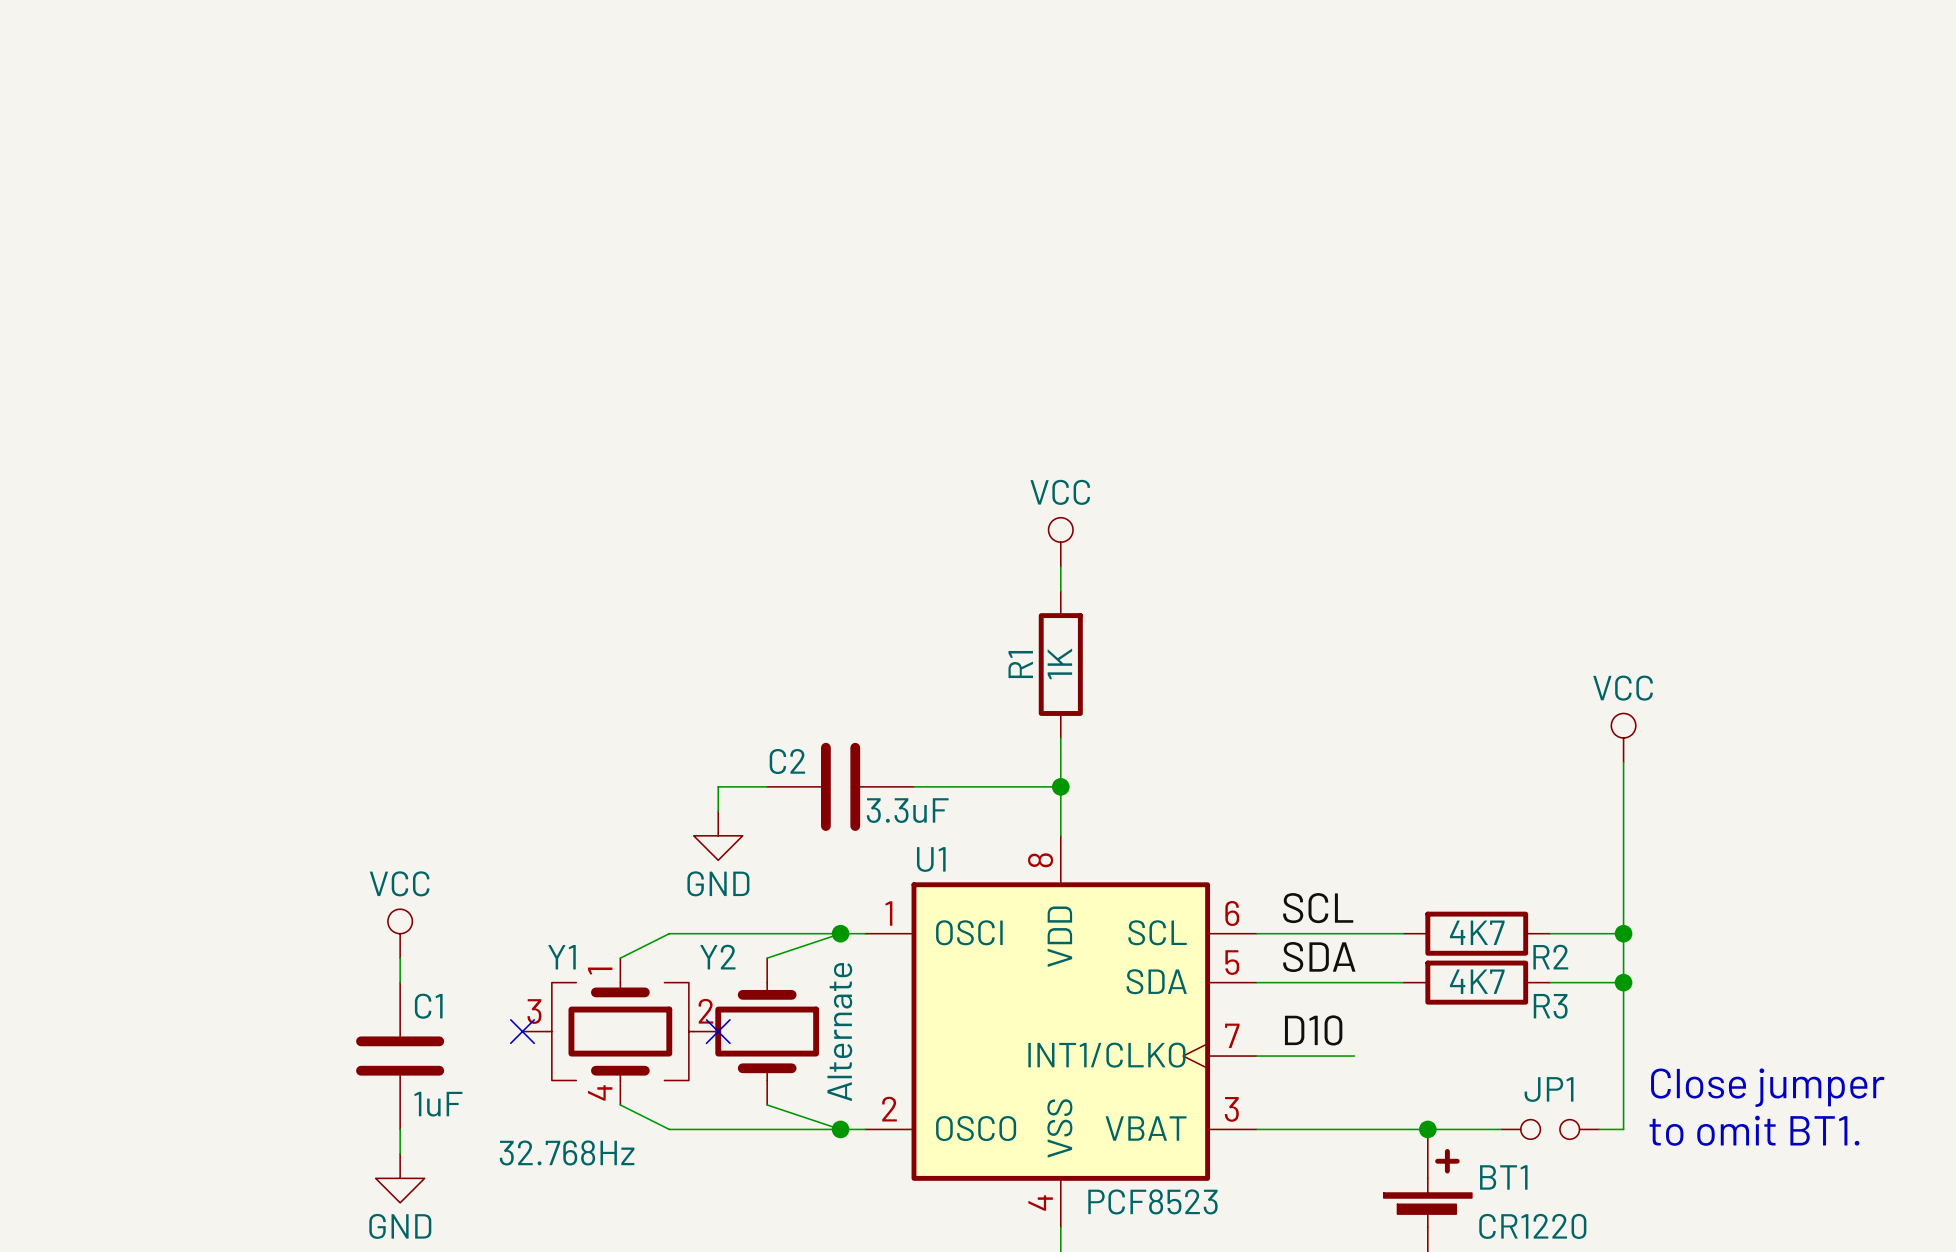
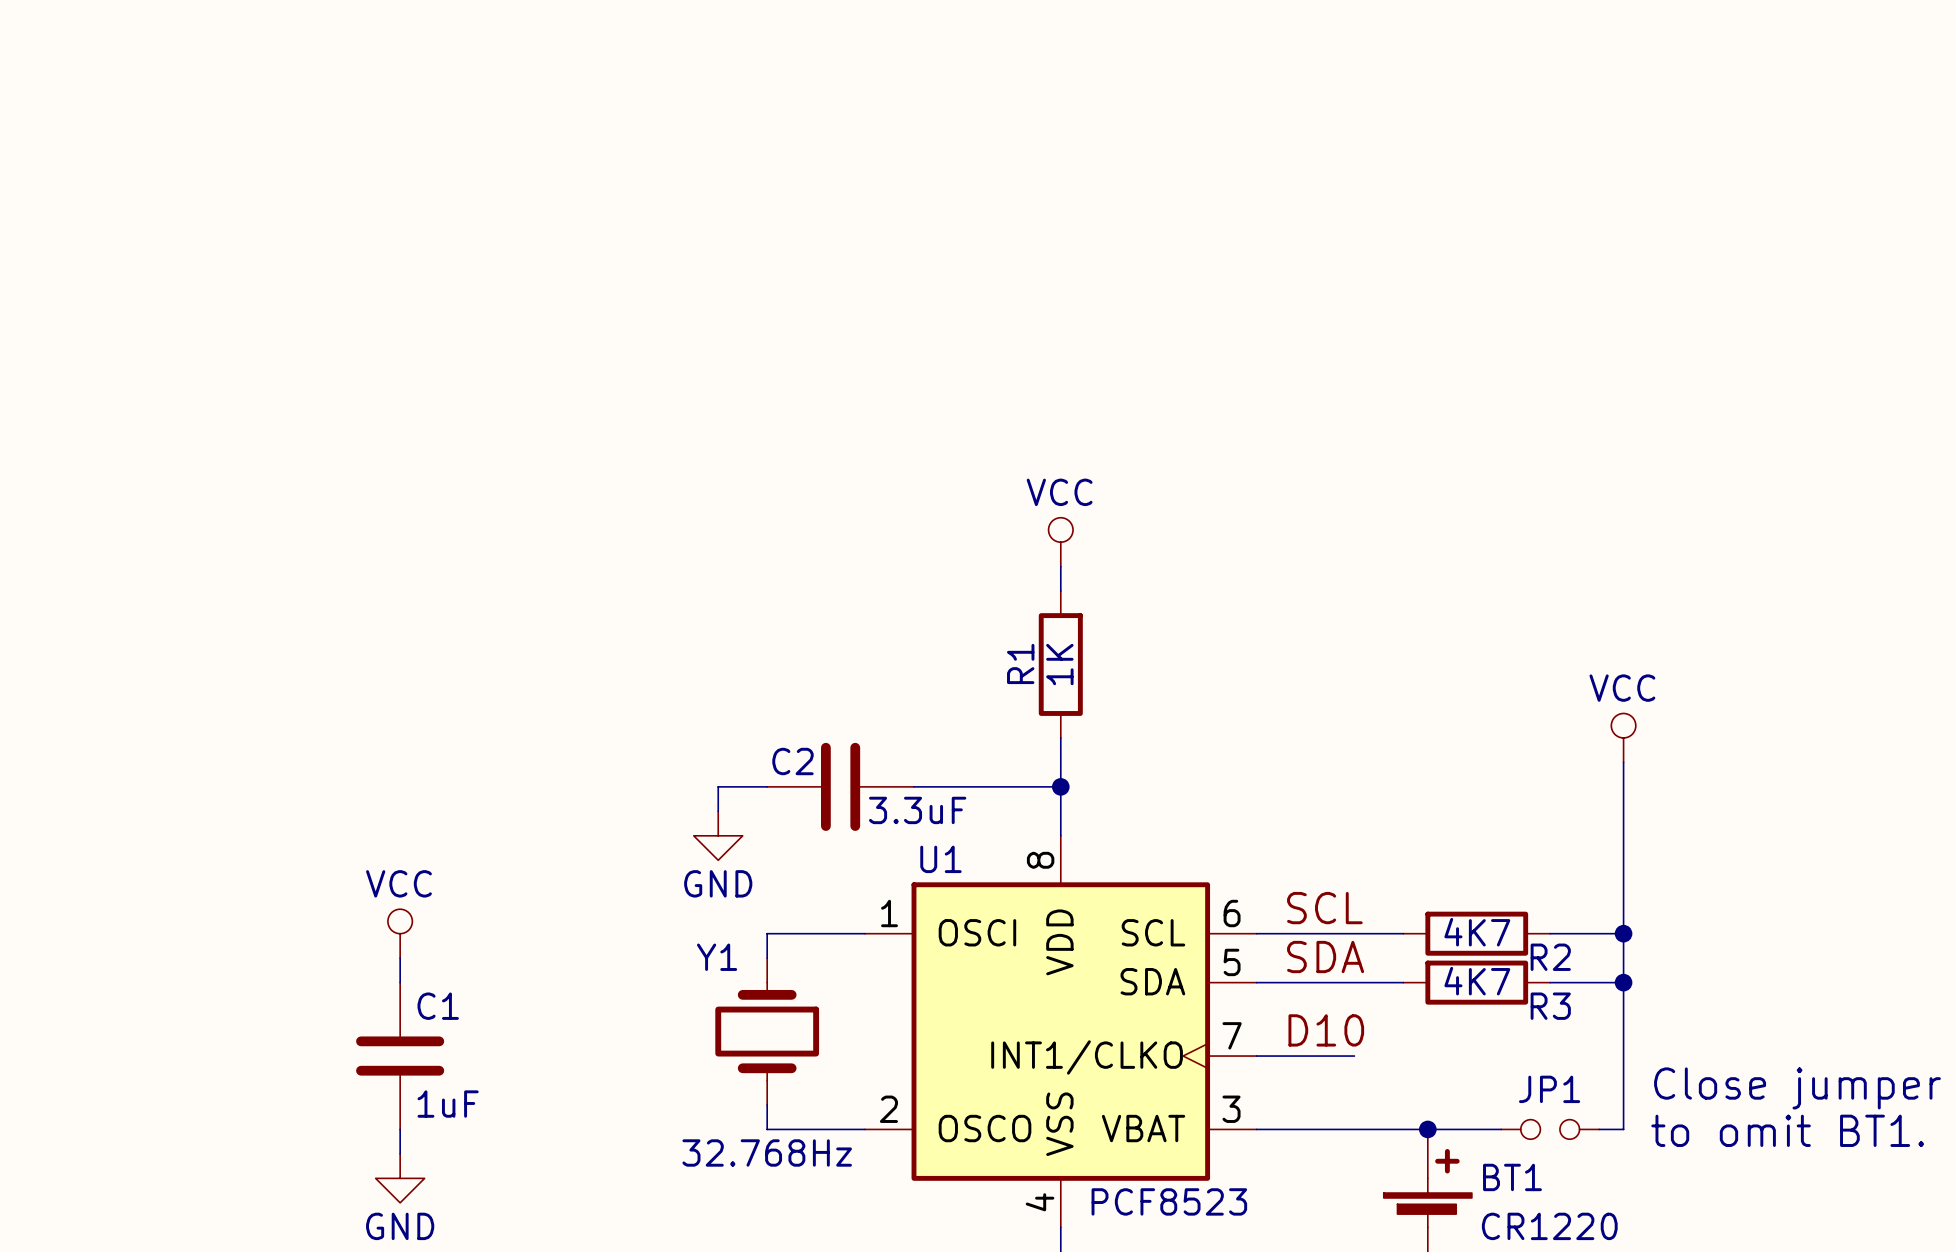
wire: (767, 933) (669, 933) (620, 958) -> none
wire: (840, 933) (767, 958) -> (767, 933) (767, 958)
junction: (840, 933) -> none
Y2 name: Y2 (717, 957) -> Y1 (717, 957)
no-connect mark: (522, 1031) -> none
Y1: 32.768Hz (620, 1031) -> none
no-connect mark: (718, 1031) -> none
Y2 value: Alternate (839, 1032) -> 32.768Hz (767, 1152)
wire: (620, 1104) (669, 1129) (767, 1129) -> none
wire: (767, 1104) (840, 1129) -> (767, 1104) (767, 1129)
junction: (840, 1129) -> none

